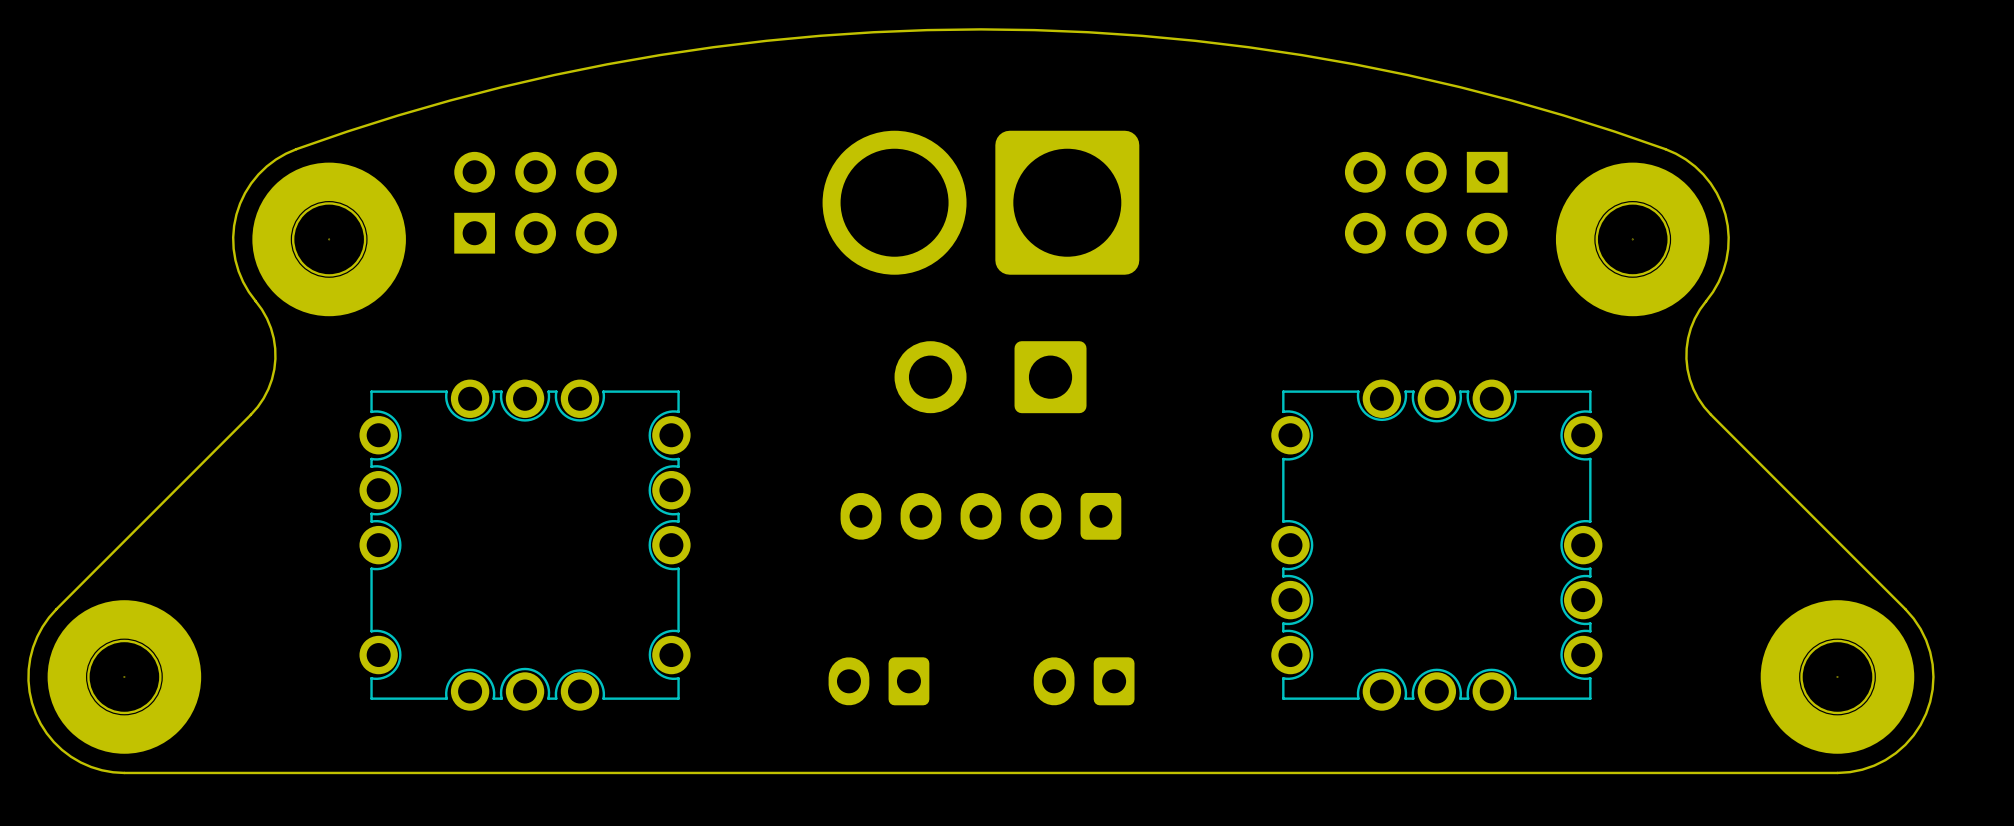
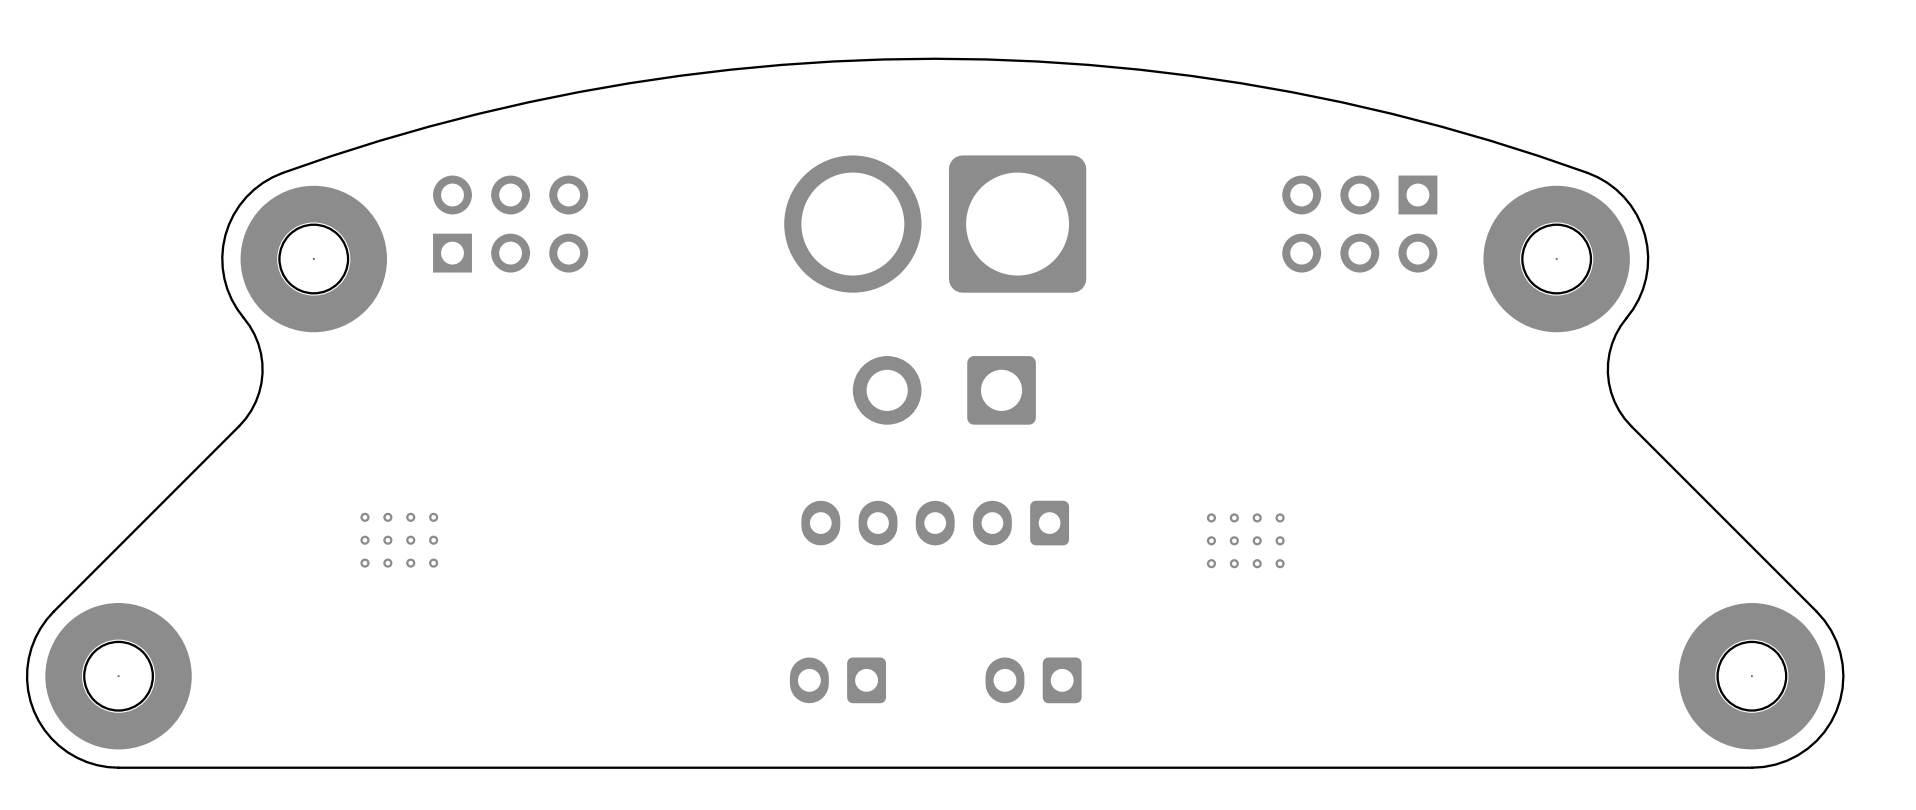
part: none -> (399, 540)
part: none -> (1245, 540)
part: (525, 545) -> none
part: (1436, 545) -> none

